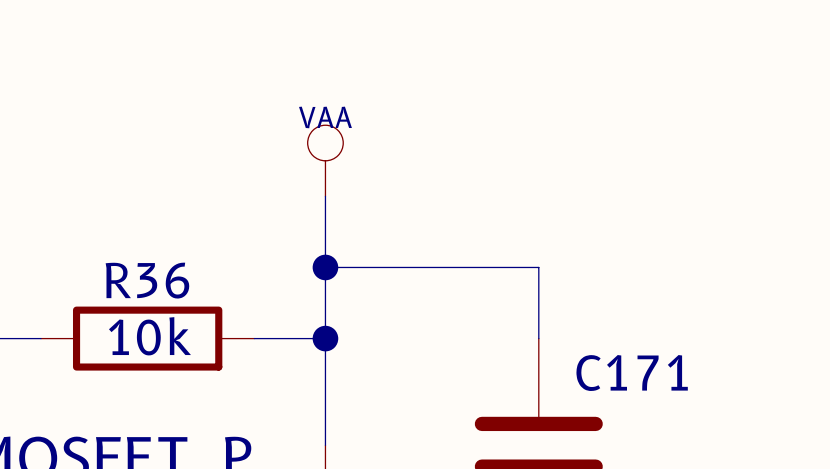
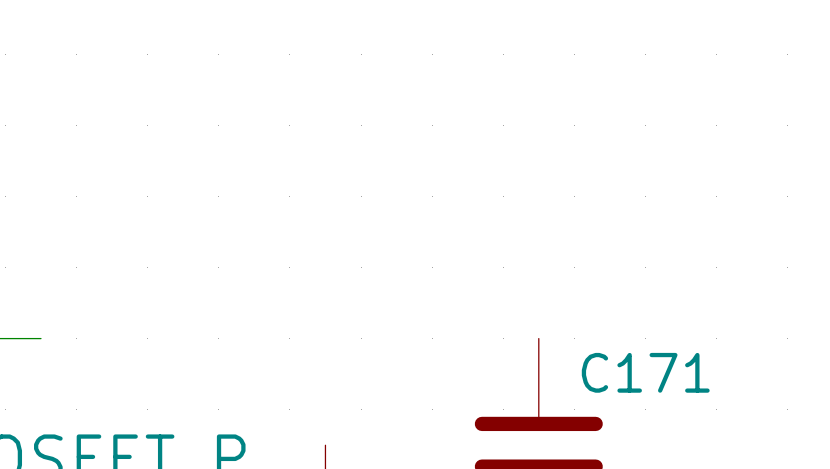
power symbol: VAA (325, 160) -> none
wire: (325, 196) (325, 445) -> none
wire: (325, 267) (538, 267) (538, 338) -> none
junction: (325, 267) -> none
R36: 10k (147, 338) -> none
wire: (254, 338) (325, 338) -> none
junction: (325, 338) -> none

